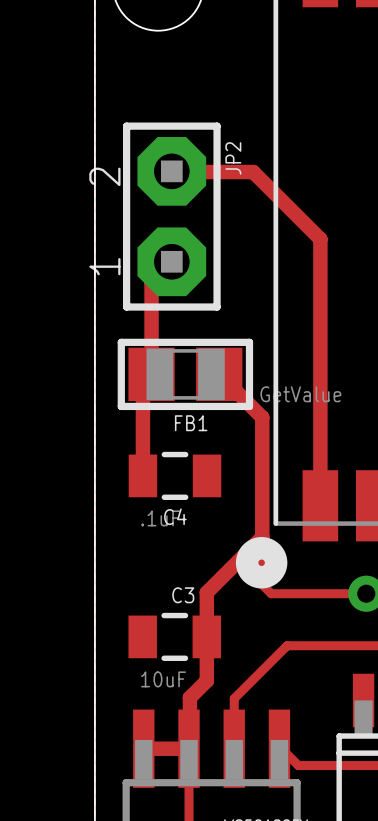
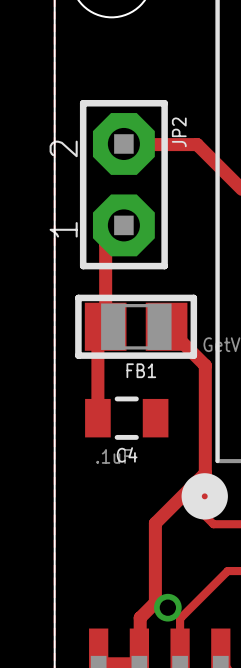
C3: 10uF (174, 636) -> none
via: none -> (167, 607)

